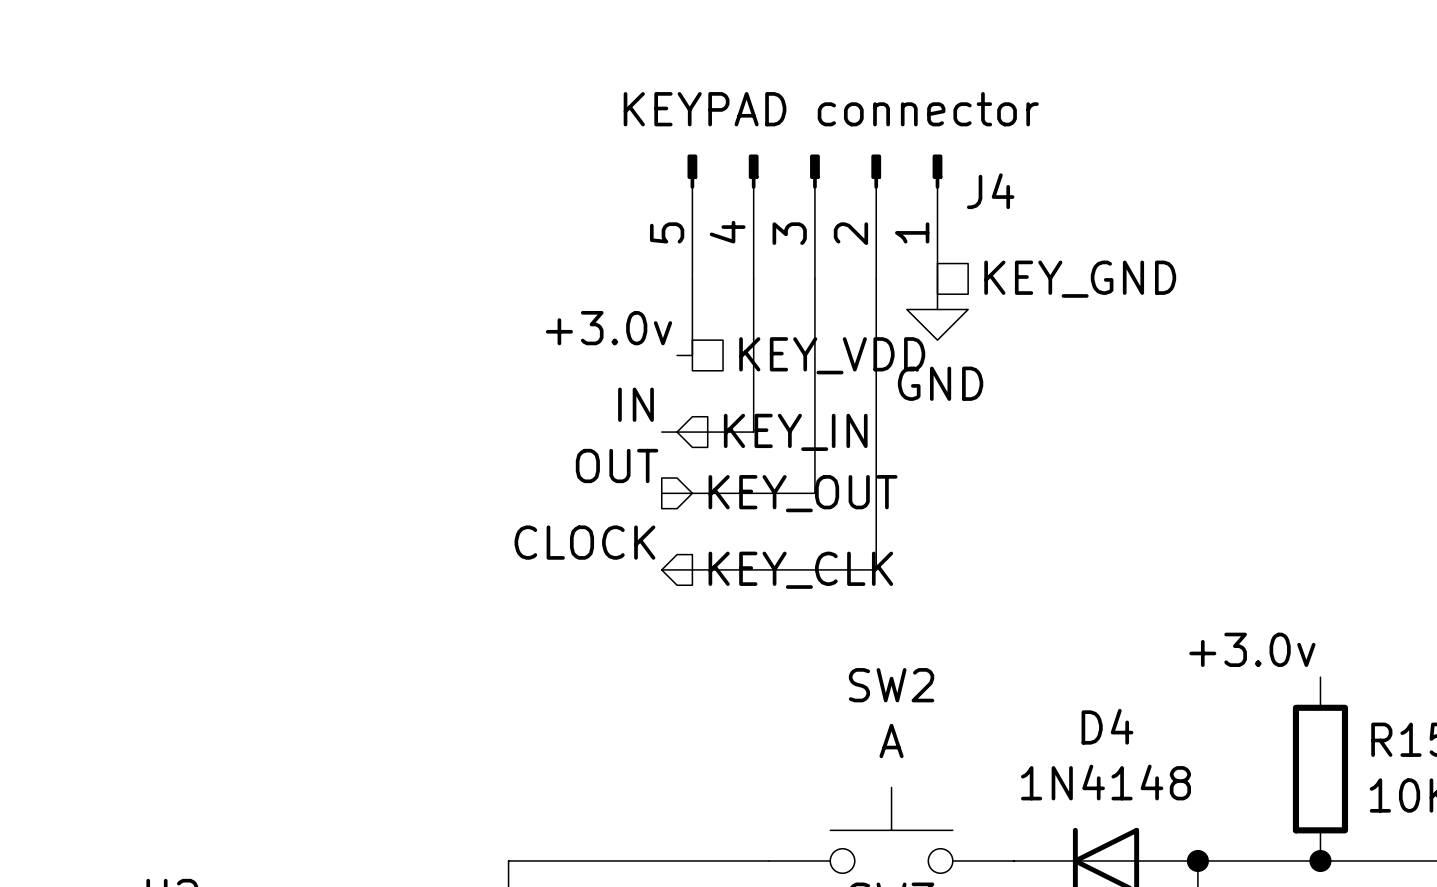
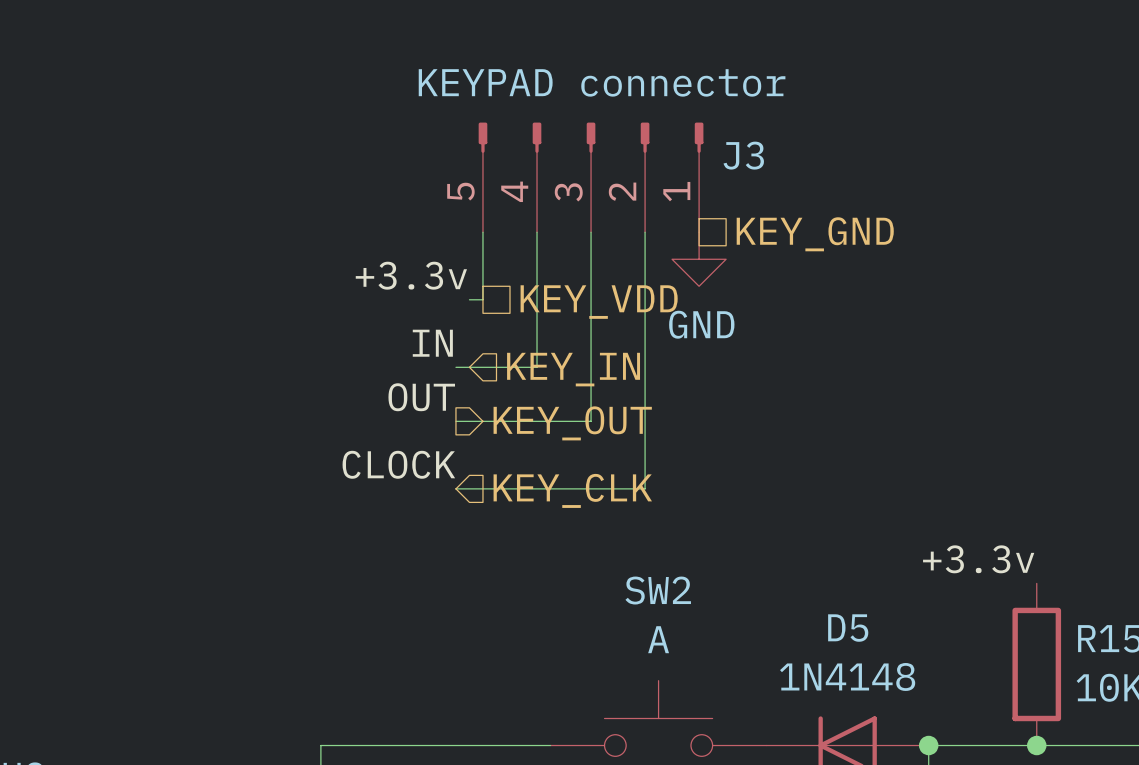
J4 name: J4 (990, 191) -> J3 (743, 155)
label: +3.0v (609, 328) -> +3.3v (411, 275)
label: +3.0v (1252, 649) -> +3.3v (978, 559)
D4 name: D4 (1107, 726) -> D5 (848, 628)

